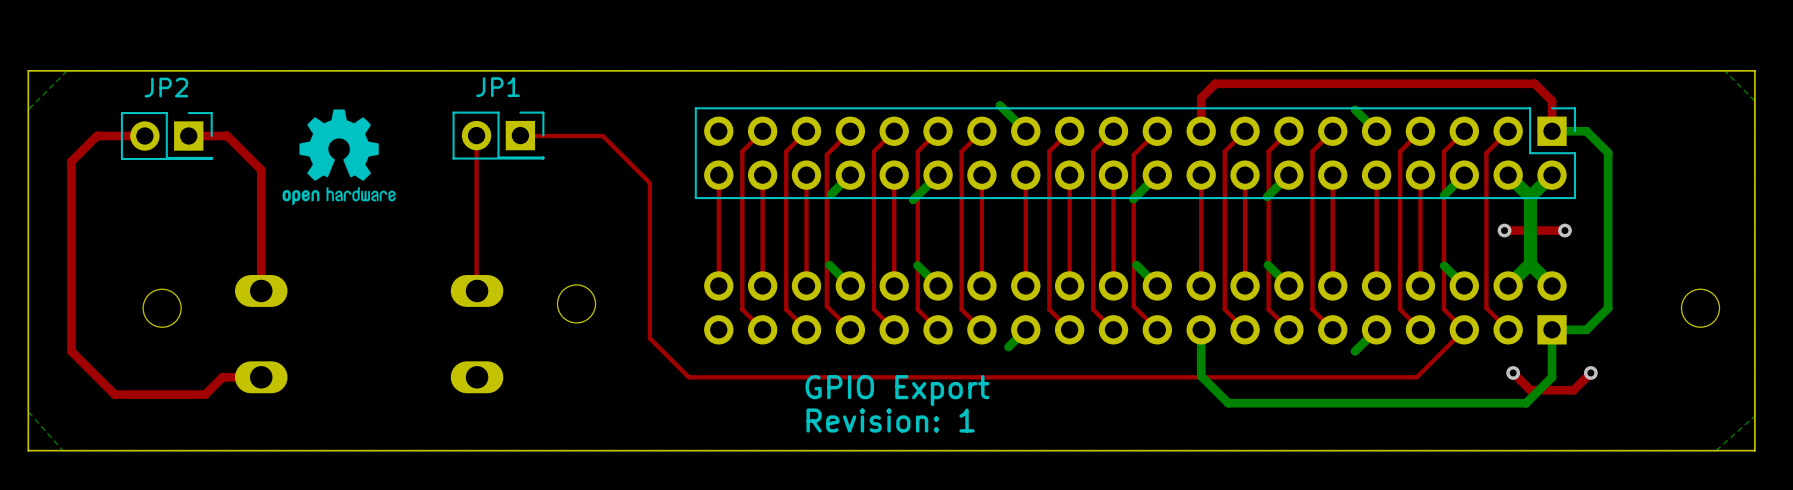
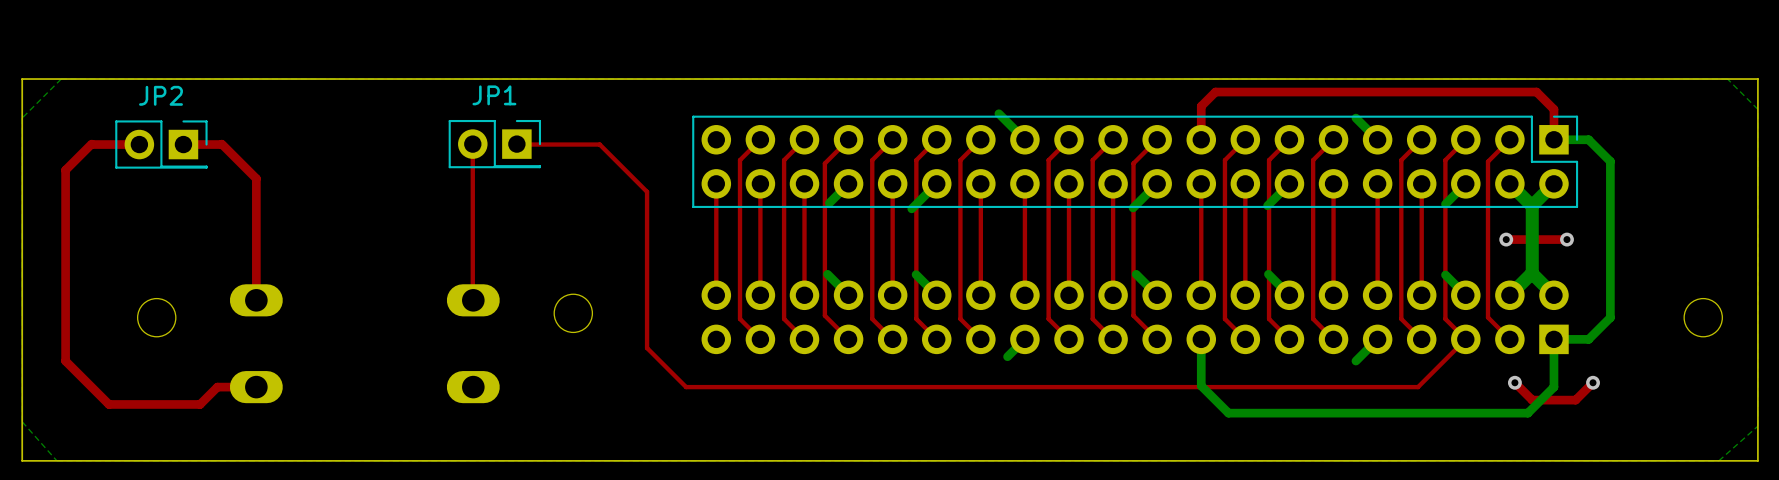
drawing: [282, 109, 396, 206] -> none
text: GPIO Export (897, 390) -> none
text: Revision: 1 (890, 420) -> none

